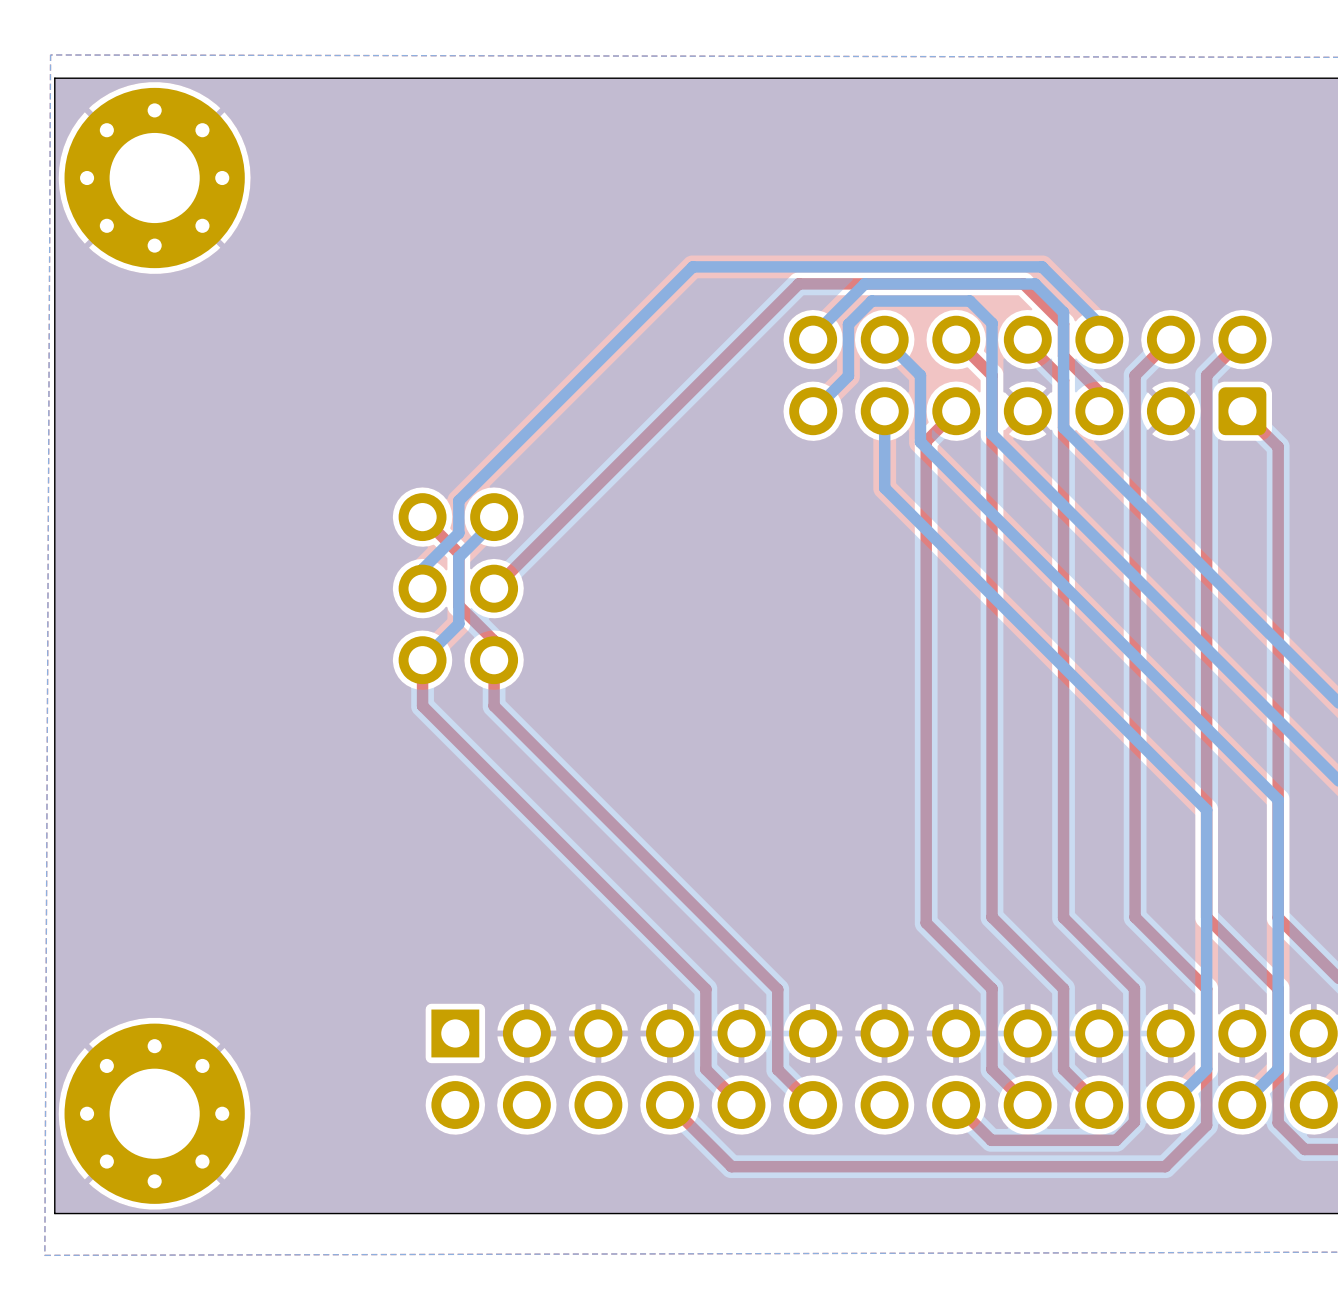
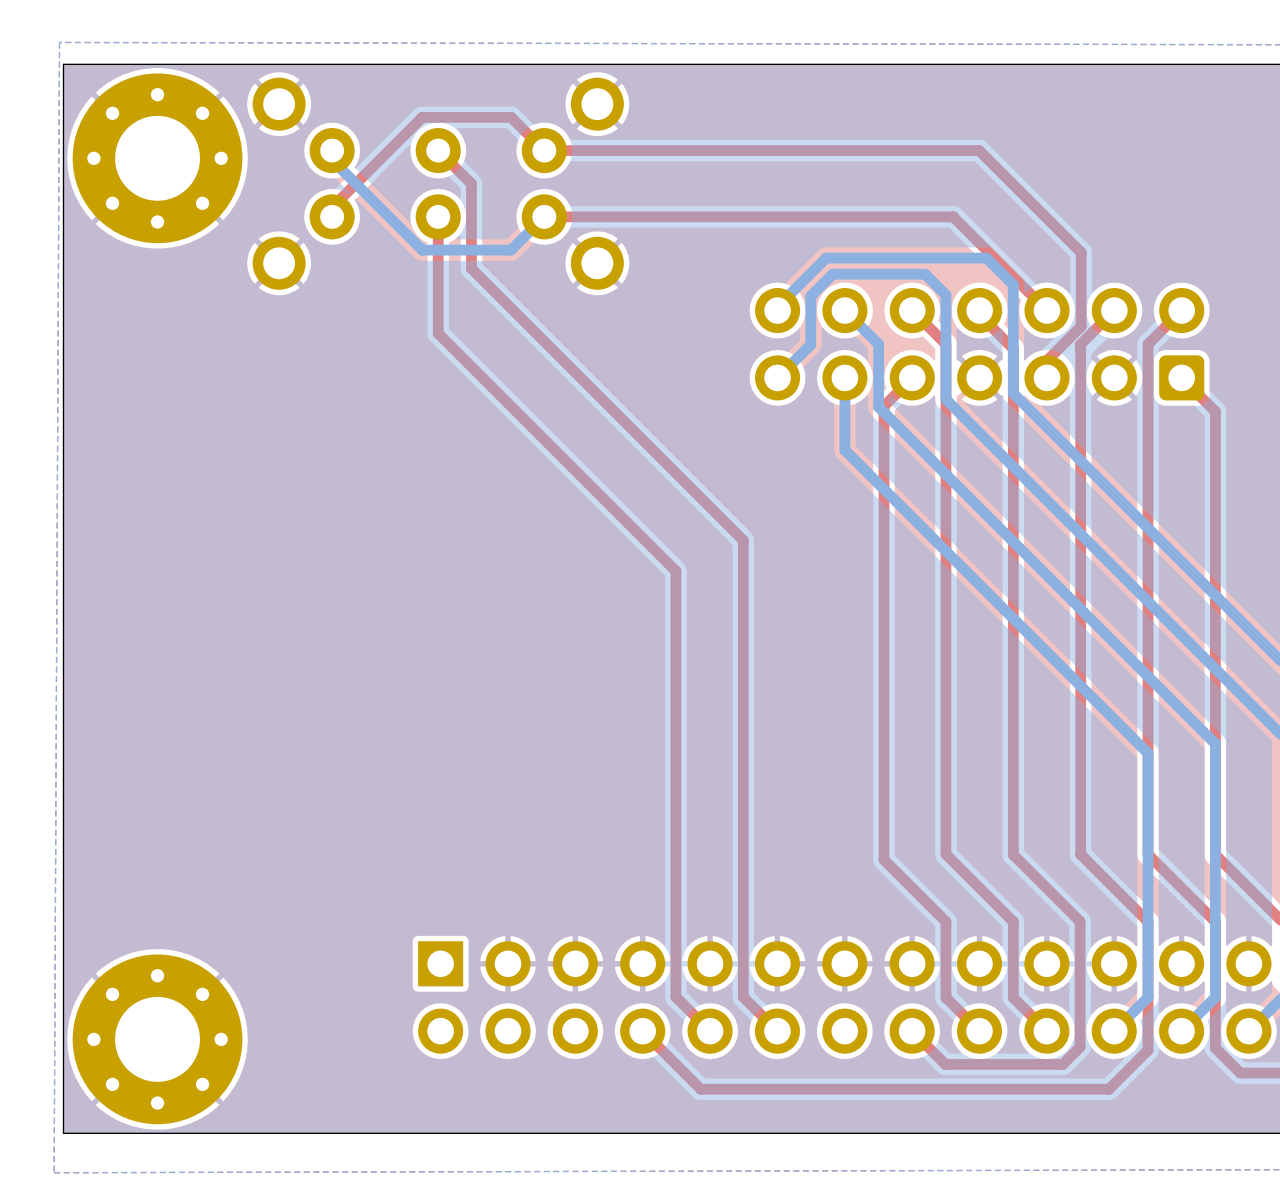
bottom track: none -> (332, 150) (332, 159) (422, 250) (511, 250) (544, 216)
part: none -> (438, 183)
top track: none -> (544, 216) (953, 216) (1047, 310)
bottom track: (1099, 339) (1099, 324) (1042, 266) (692, 266) (458, 500) (458, 533) (422, 569) (422, 588) -> none
top track: (1099, 392) (1063, 356) (1063, 323) (1023, 283) (798, 283) (494, 588) -> (1047, 360) (1081, 326) (1081, 252) (979, 150) (544, 150) (511, 117) (422, 117) (332, 207) (332, 216)
top track: (422, 517) (458, 553) (458, 605) (494, 640) (494, 705) (777, 989) (777, 1069) -> (438, 150) (471, 183) (471, 268) (743, 540) (744, 997)
bottom track: (494, 517) (494, 521) (458, 557) (458, 623) (422, 660) -> none
part: (458, 588) -> none
top track: (422, 660) (422, 705) (705, 989) (705, 1069) -> (438, 216) (438, 333) (675, 571) (676, 997)

